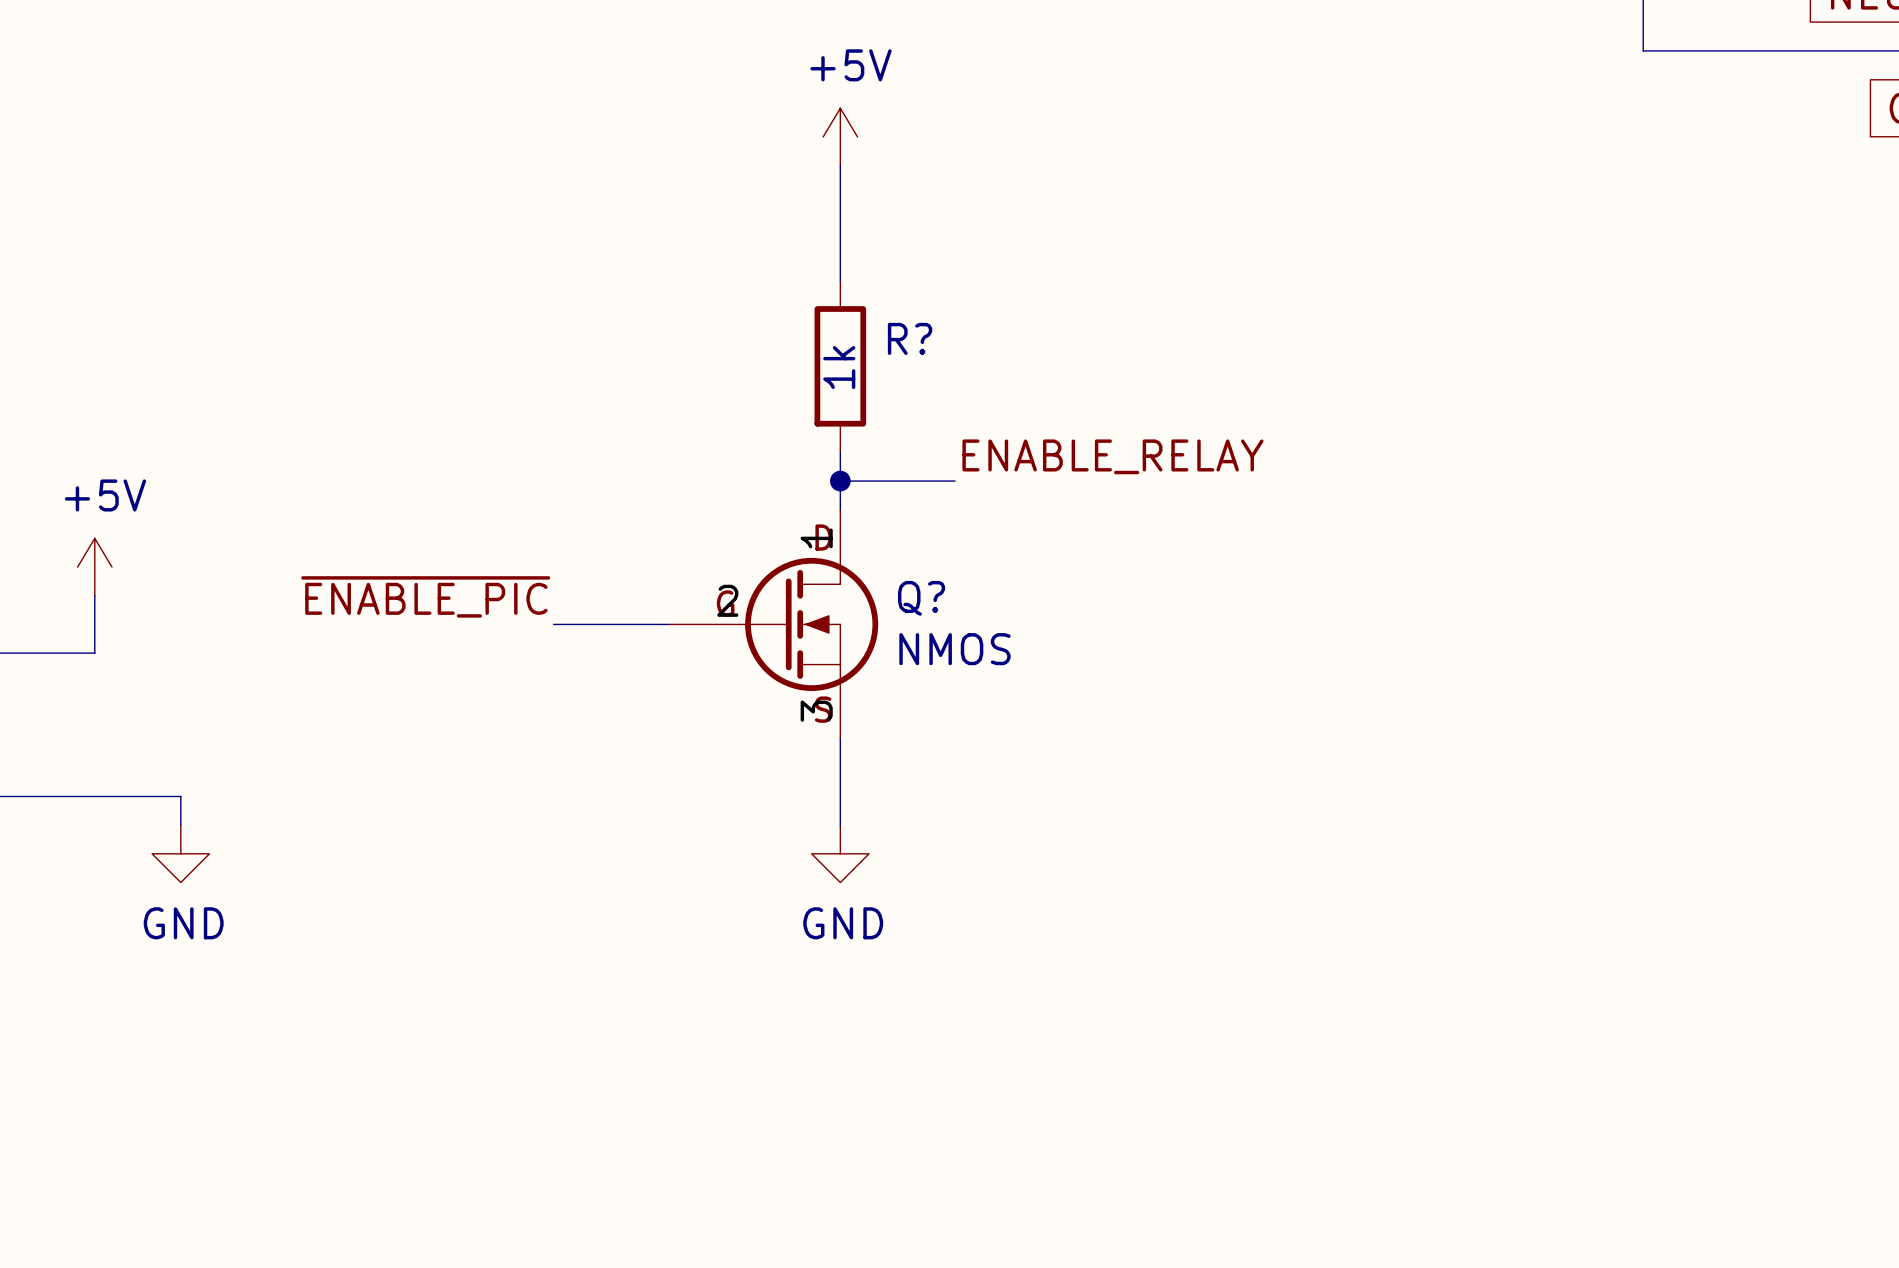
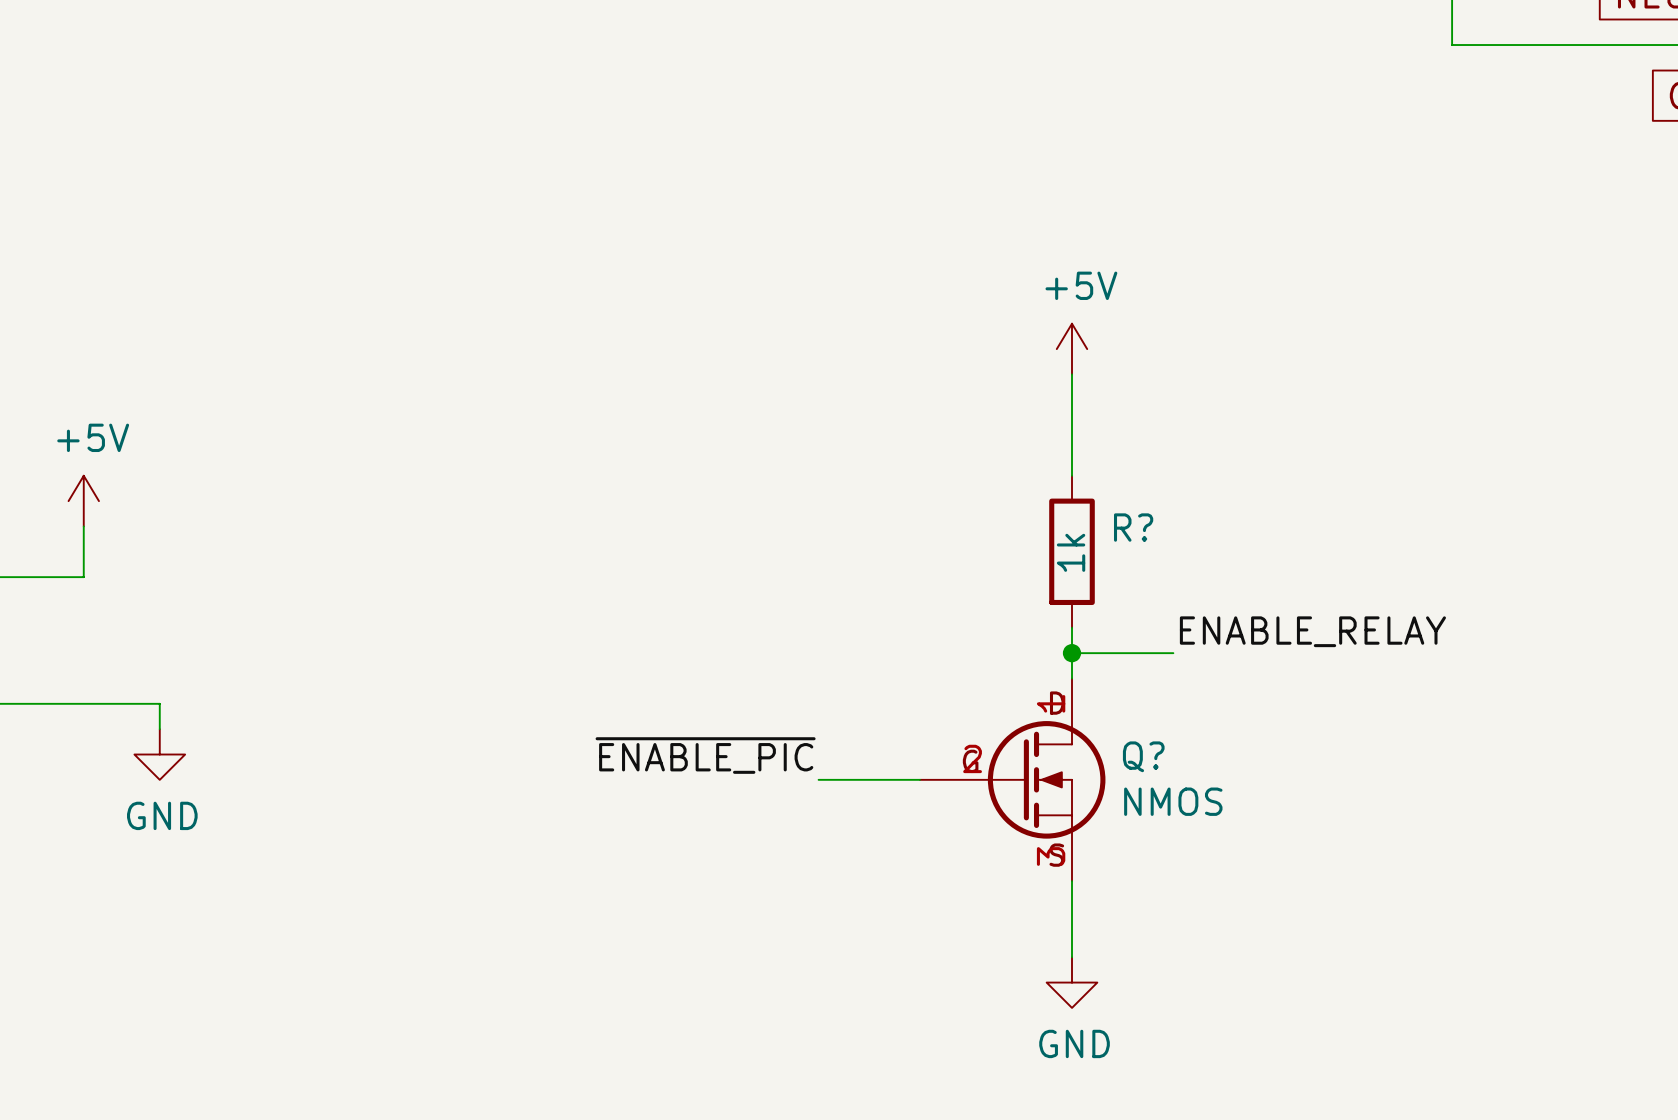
power symbol position: +5V (840, 136) -> +5V (1072, 349)
wire: (840, 165) (840, 280) -> (1072, 374) (1072, 475)
R? position: (840, 366) -> (1072, 551)
wire: (840, 452) (840, 509) -> (1072, 627) (1072, 678)
label position: ENABLE_RELAY (1112, 456) -> ENABLE_RELAY (1312, 631)
wire: (840, 481) (955, 481) -> (1072, 653) (1173, 653)
junction: (840, 481) -> none
label position: ~{ENABLE_PIC} (425, 596) -> ~{ENABLE_PIC} (705, 755)
wire: (553, 624) (668, 624) -> (818, 779) (919, 779)
Q? position: (773, 624) -> (1012, 779)
wire: (840, 739) (840, 825) -> (1072, 881) (1072, 957)
junction: none -> (1072, 653)
power symbol position: GND (840, 853) -> GND (1072, 982)

